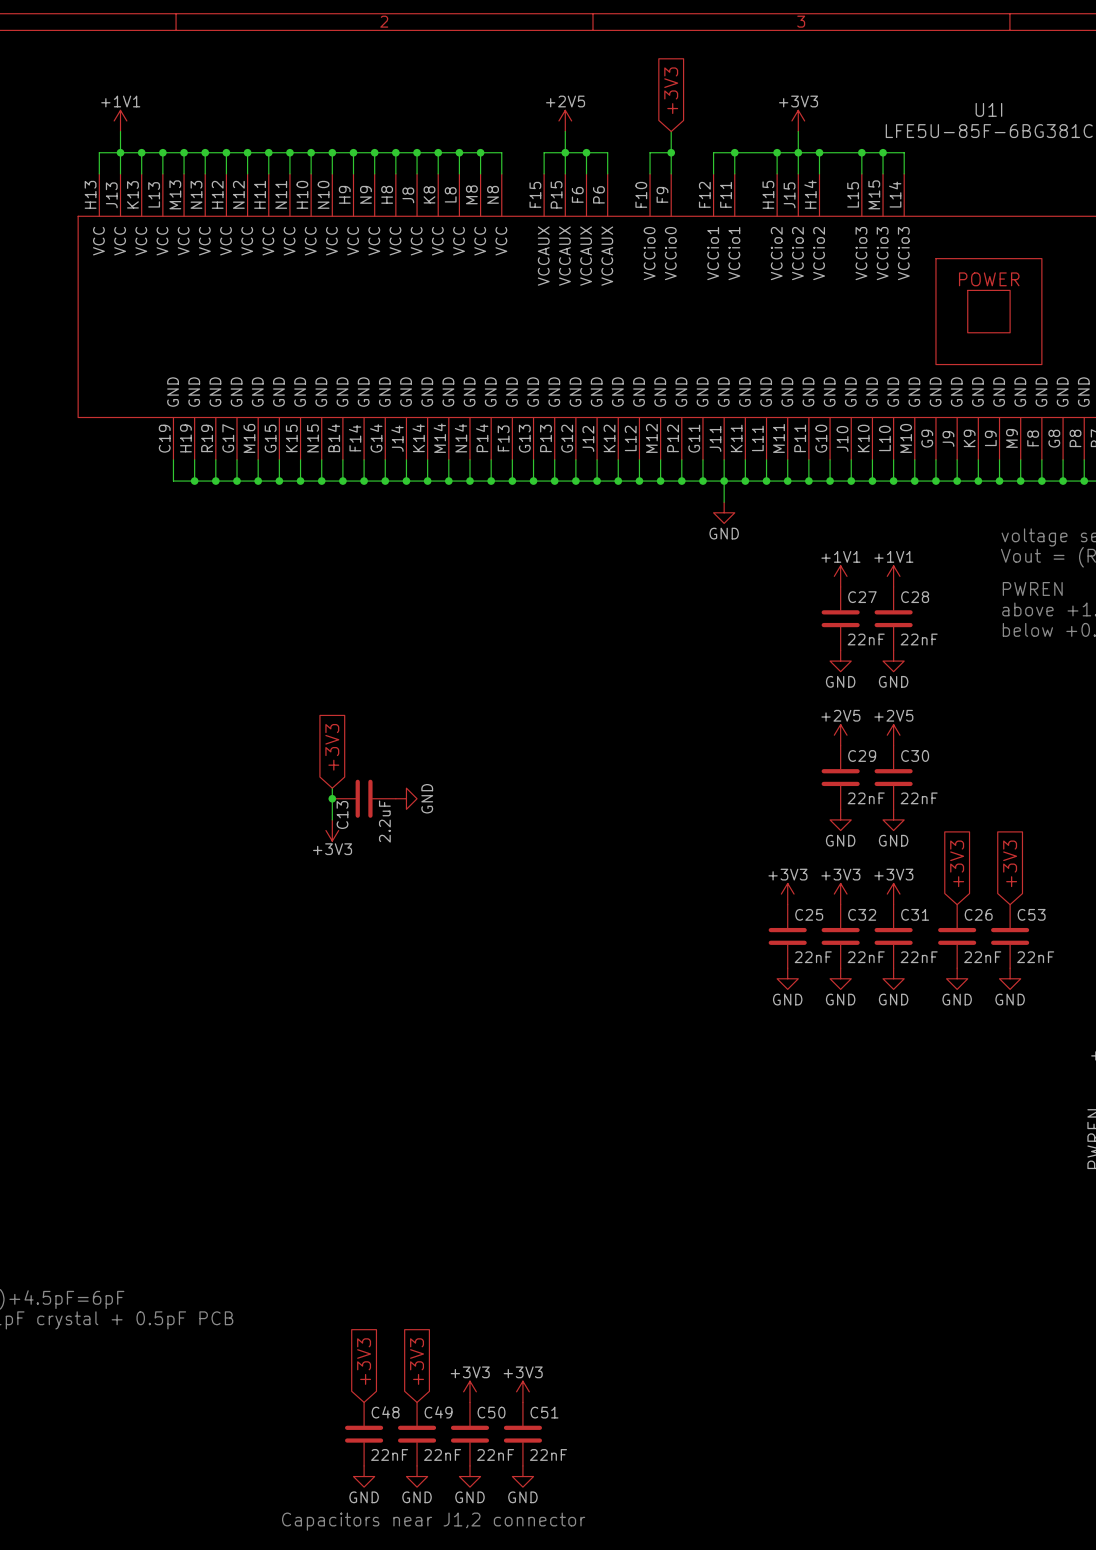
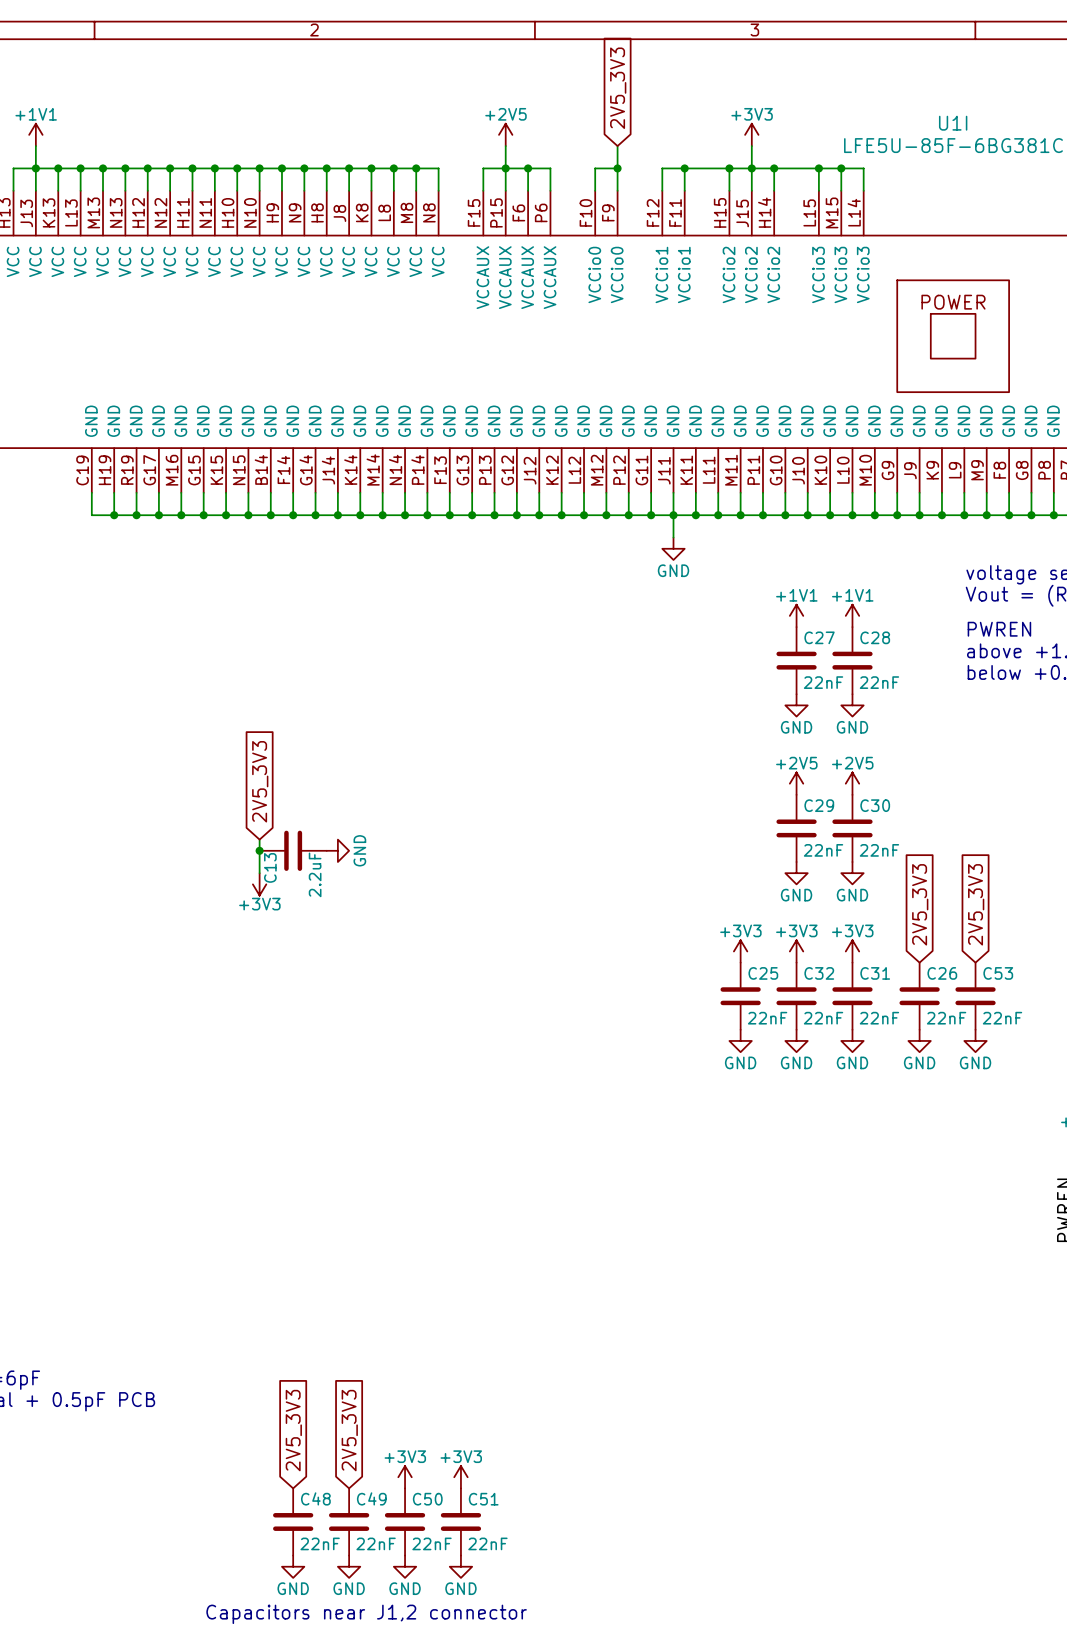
global label: +3V3 (671, 90) -> 2V5_3V3 (618, 88)
global label: +3V3 (332, 747) -> 2V5_3V3 (260, 781)
global label: +3V3 (957, 863) -> 2V5_3V3 (920, 904)
global label: +3V3 (1010, 863) -> 2V5_3V3 (976, 904)
global label: +3V3 (364, 1361) -> 2V5_3V3 (293, 1430)
global label: +3V3 (417, 1361) -> 2V5_3V3 (349, 1430)

